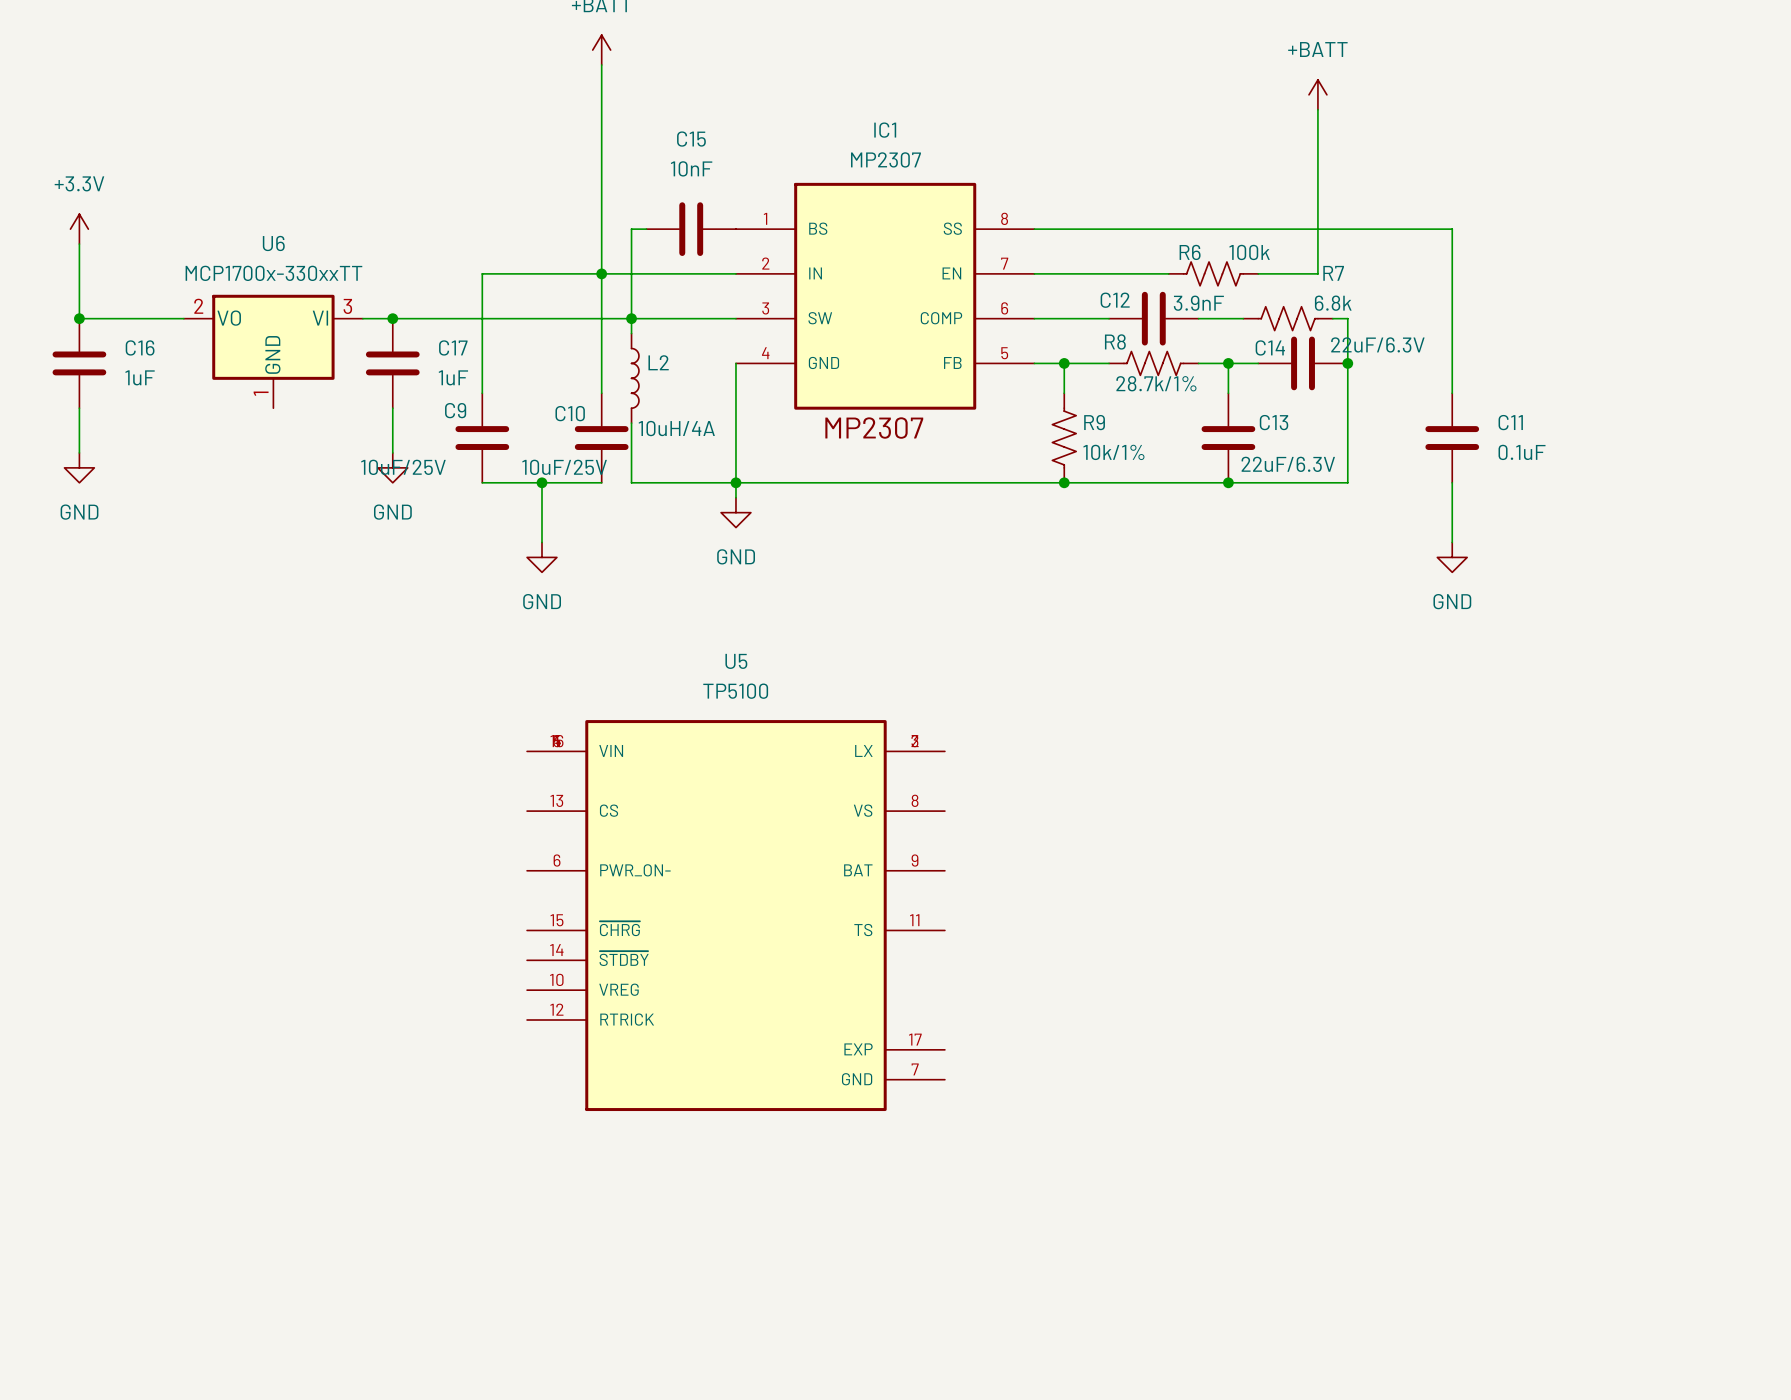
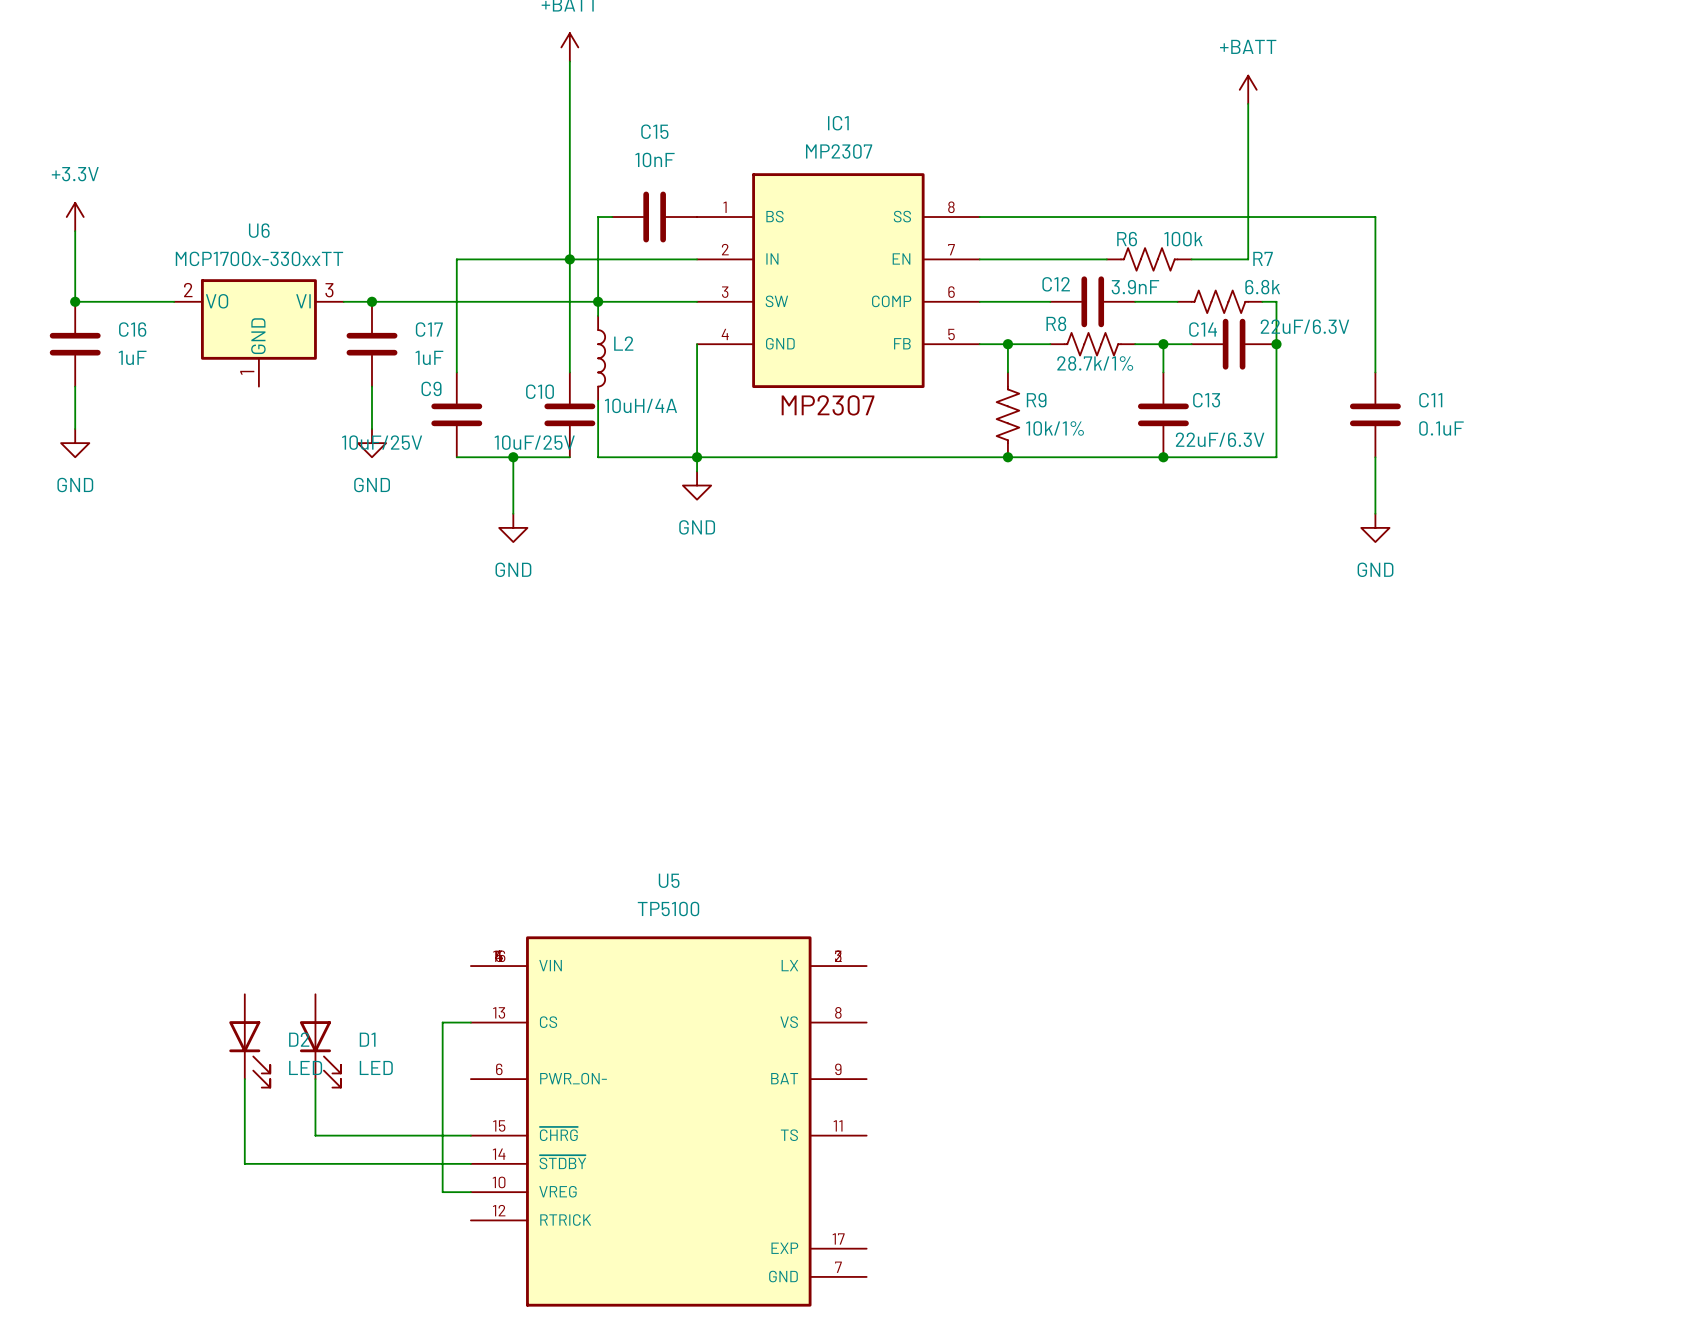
U5 position: (735, 915) -> (668, 1121)
wire: none -> (470, 1022) (442, 1022) (442, 1192) (470, 1192)
D2: none -> LED (249, 1040)
D1: none -> LED (320, 1040)
wire: none -> (244, 1079) (244, 1163) (470, 1163)
wire: none -> (315, 1079) (315, 1135) (470, 1135)

